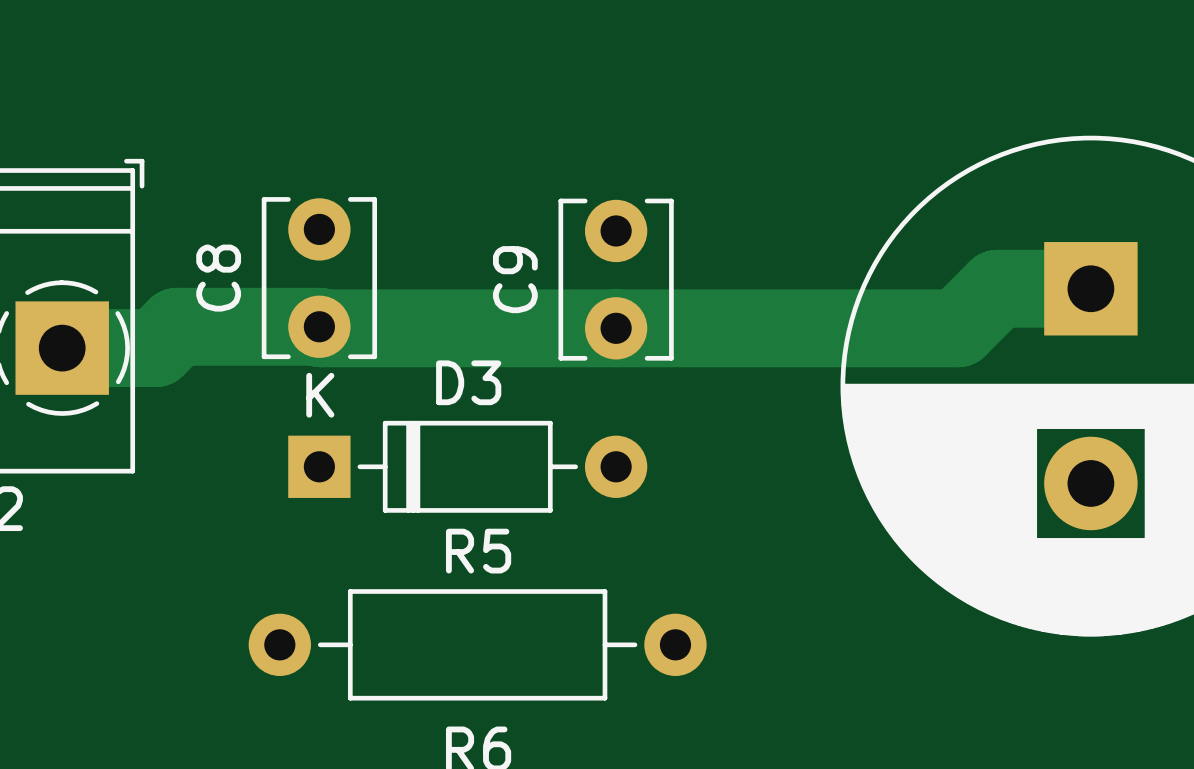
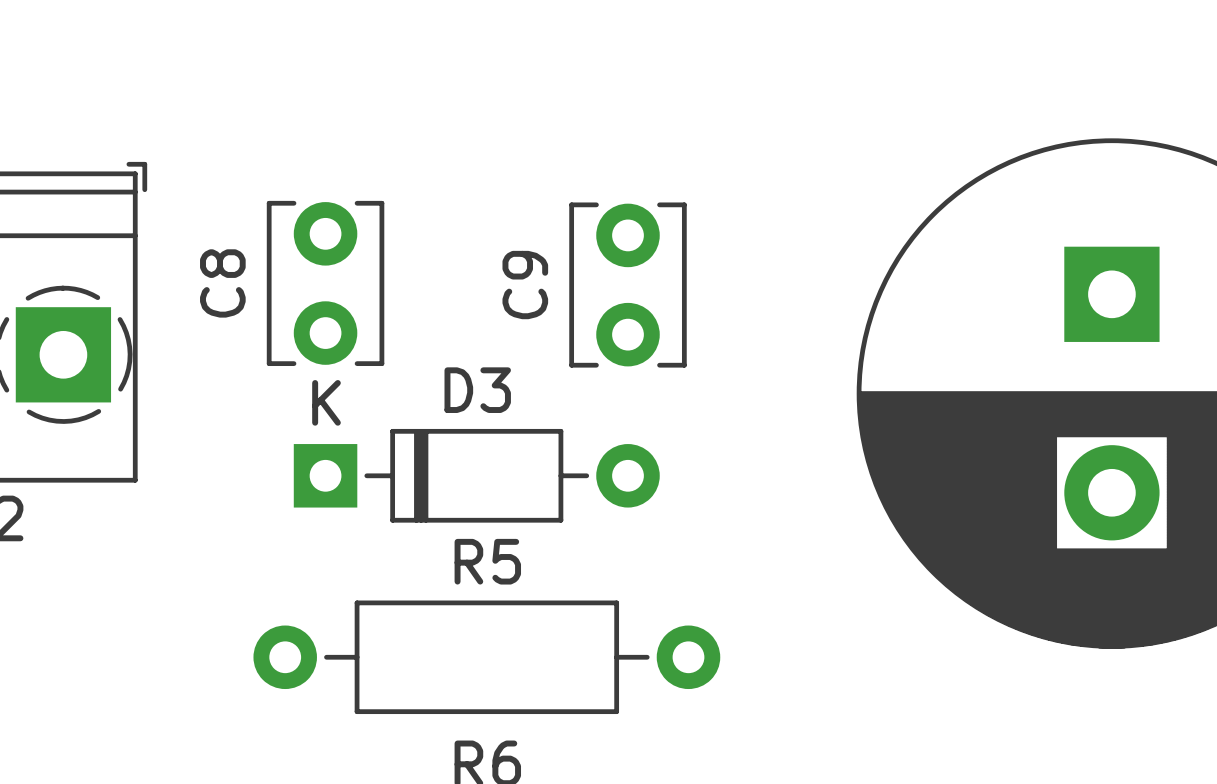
track: (1090, 288) (997, 288) (957, 328) (177, 326) (155, 348) (62, 348) -> none

